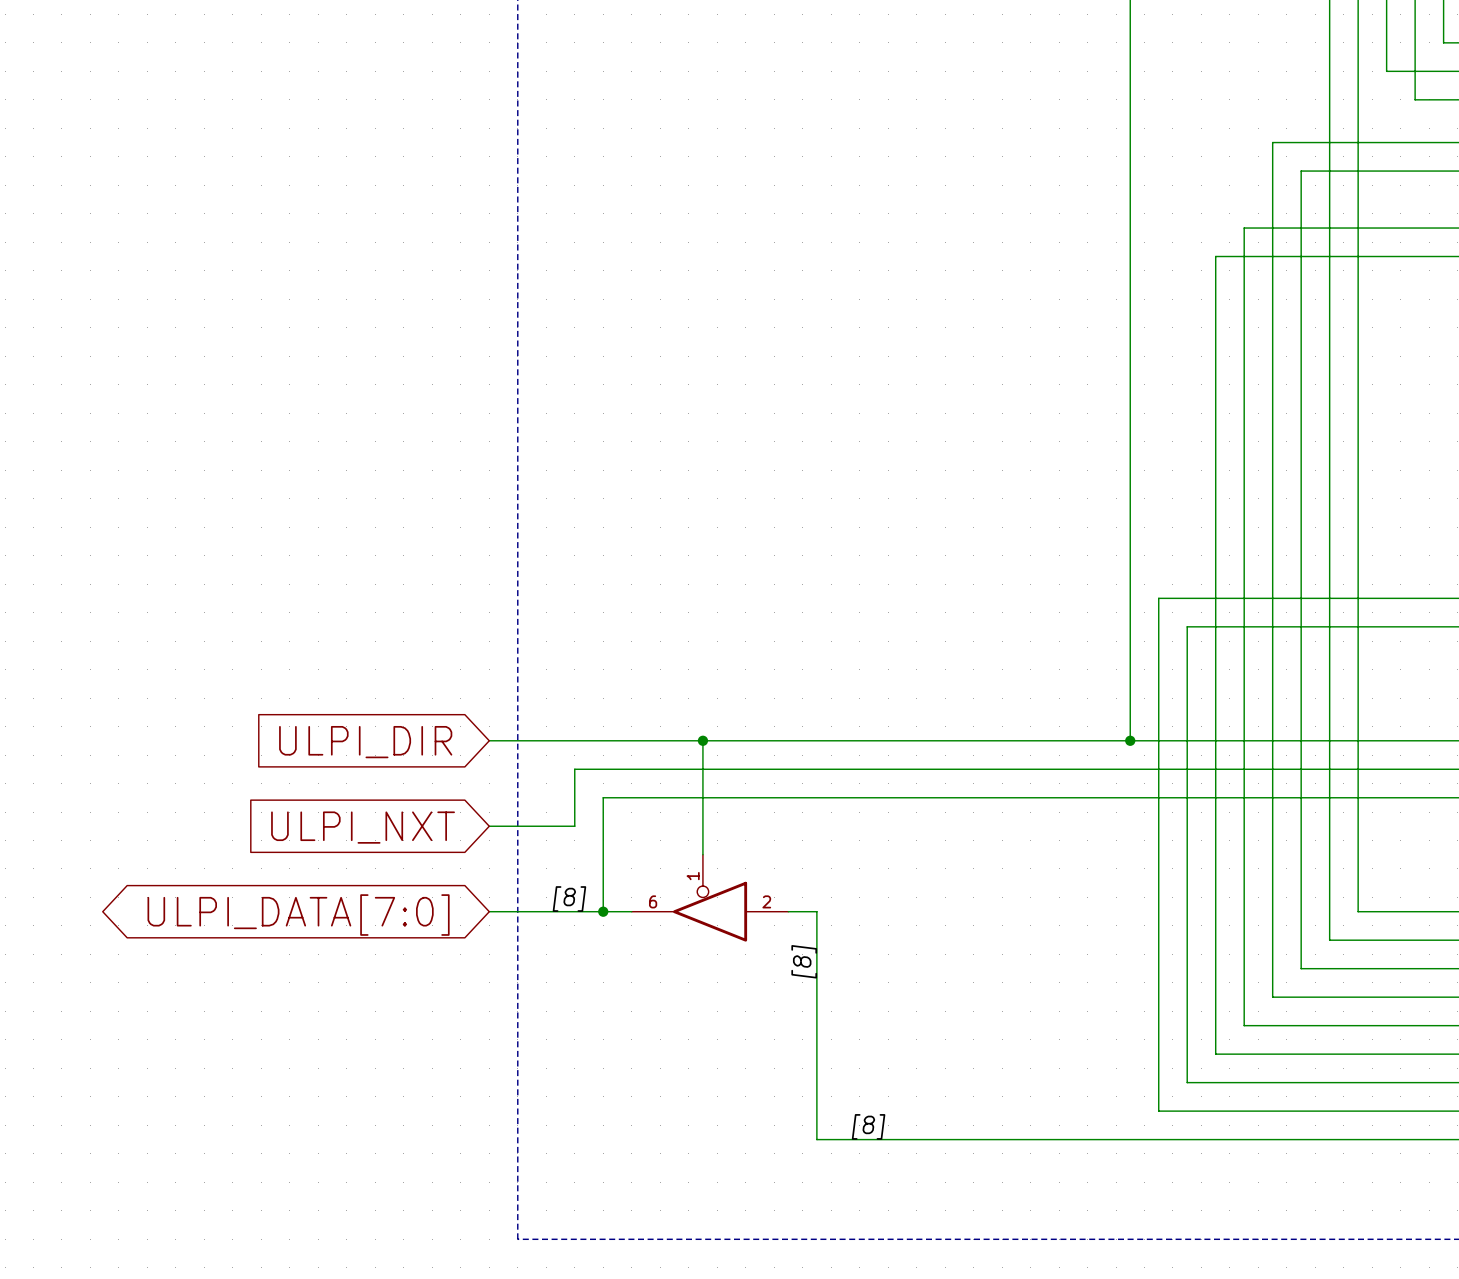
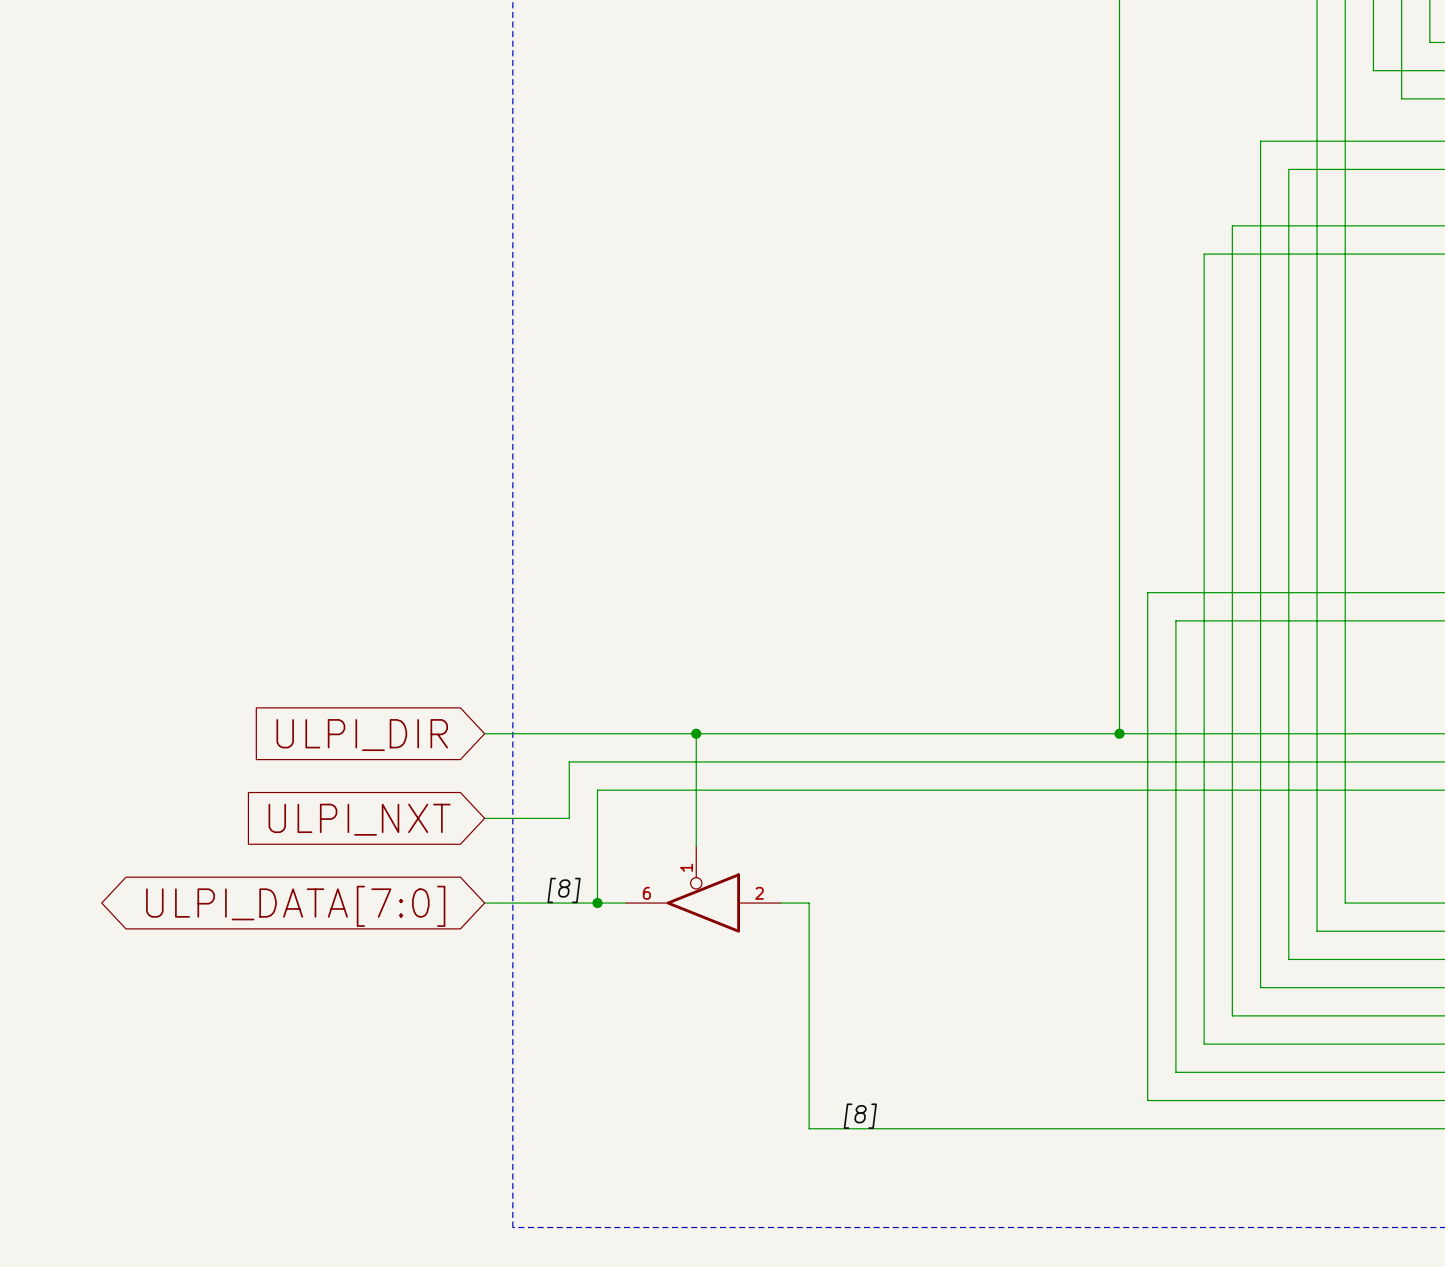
label: [8] (804, 961) -> none

